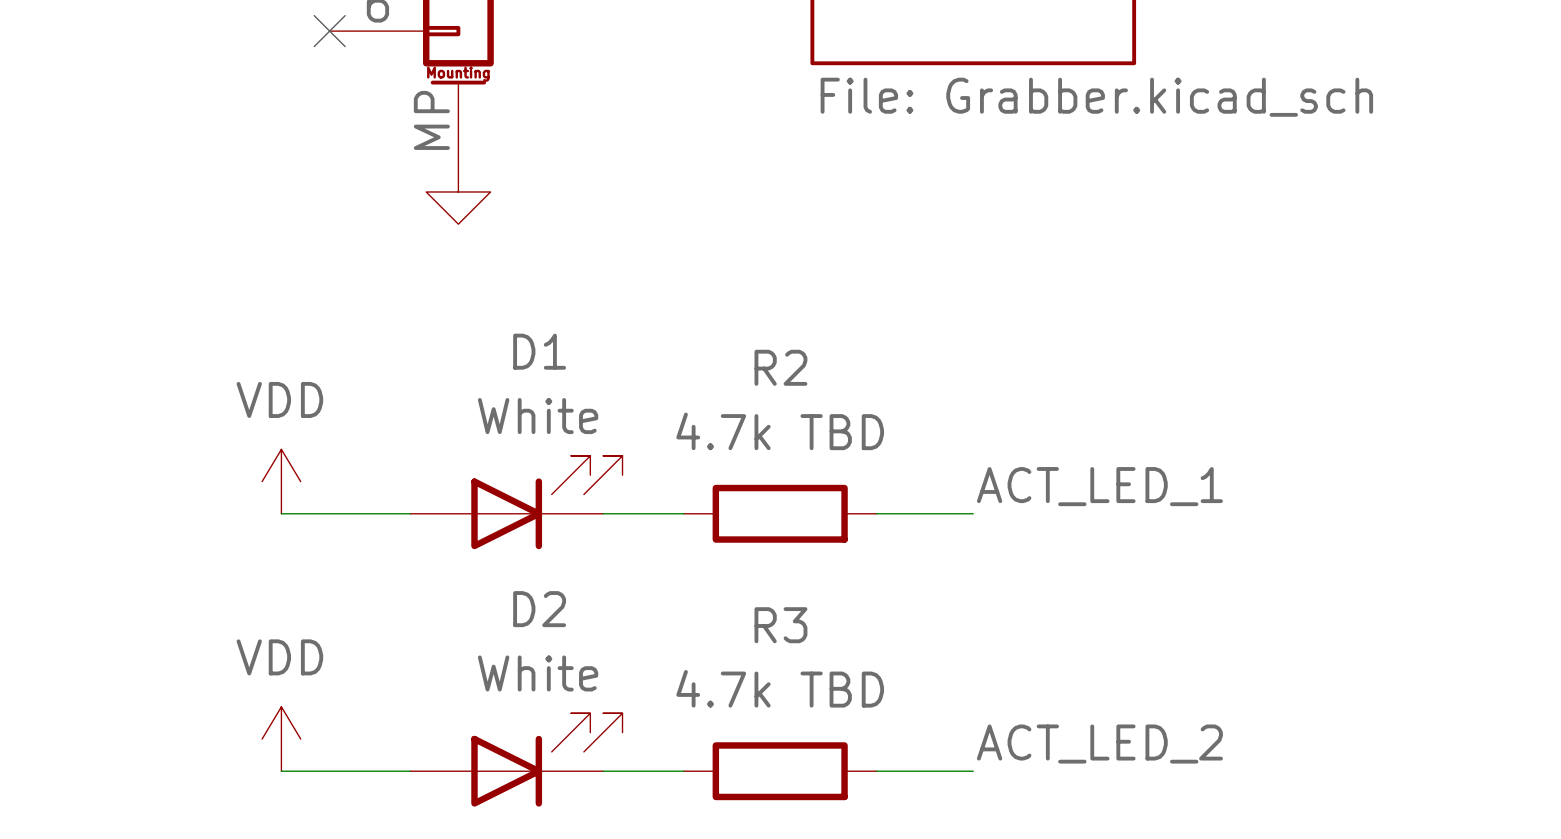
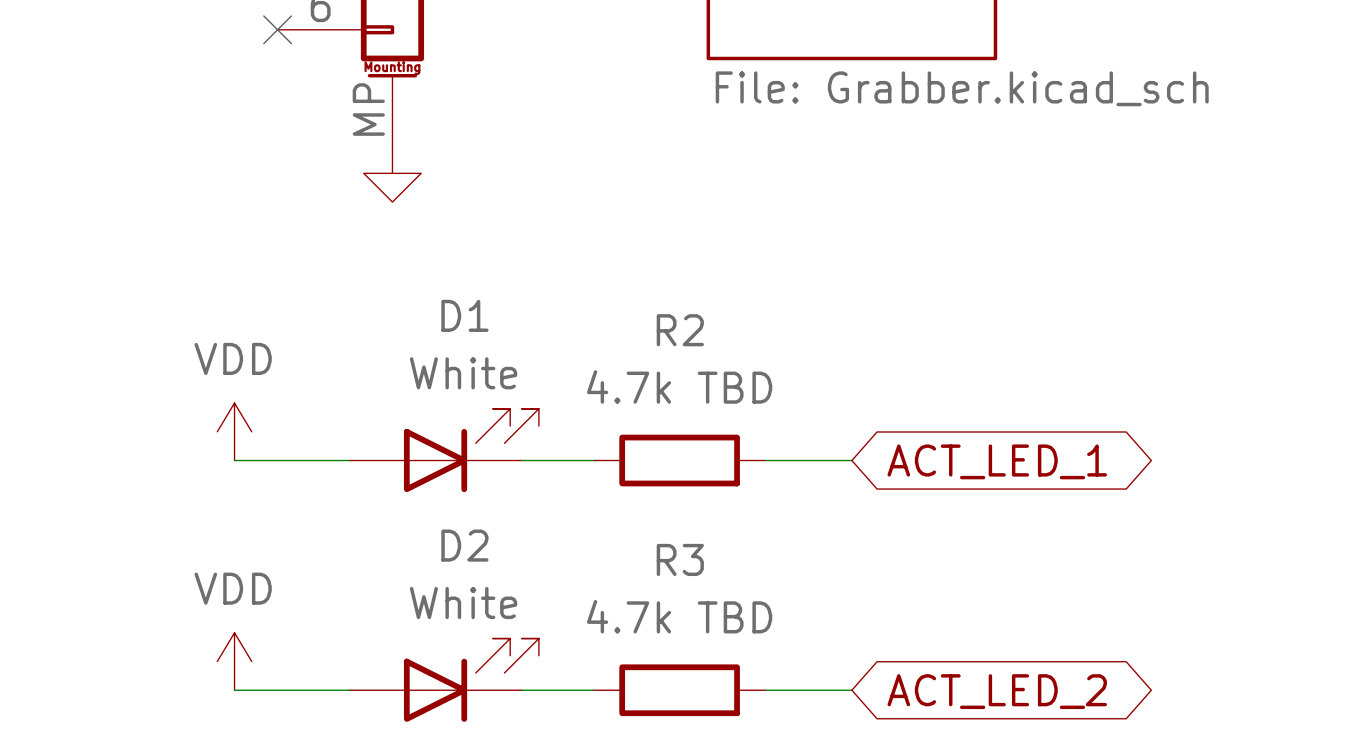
label: ACT_LED_1 (1099, 486) -> none
global label: none -> ACT_LED_1 (997, 461)
label: ACT_LED_2 (1099, 744) -> none
global label: none -> ACT_LED_2 (997, 691)

